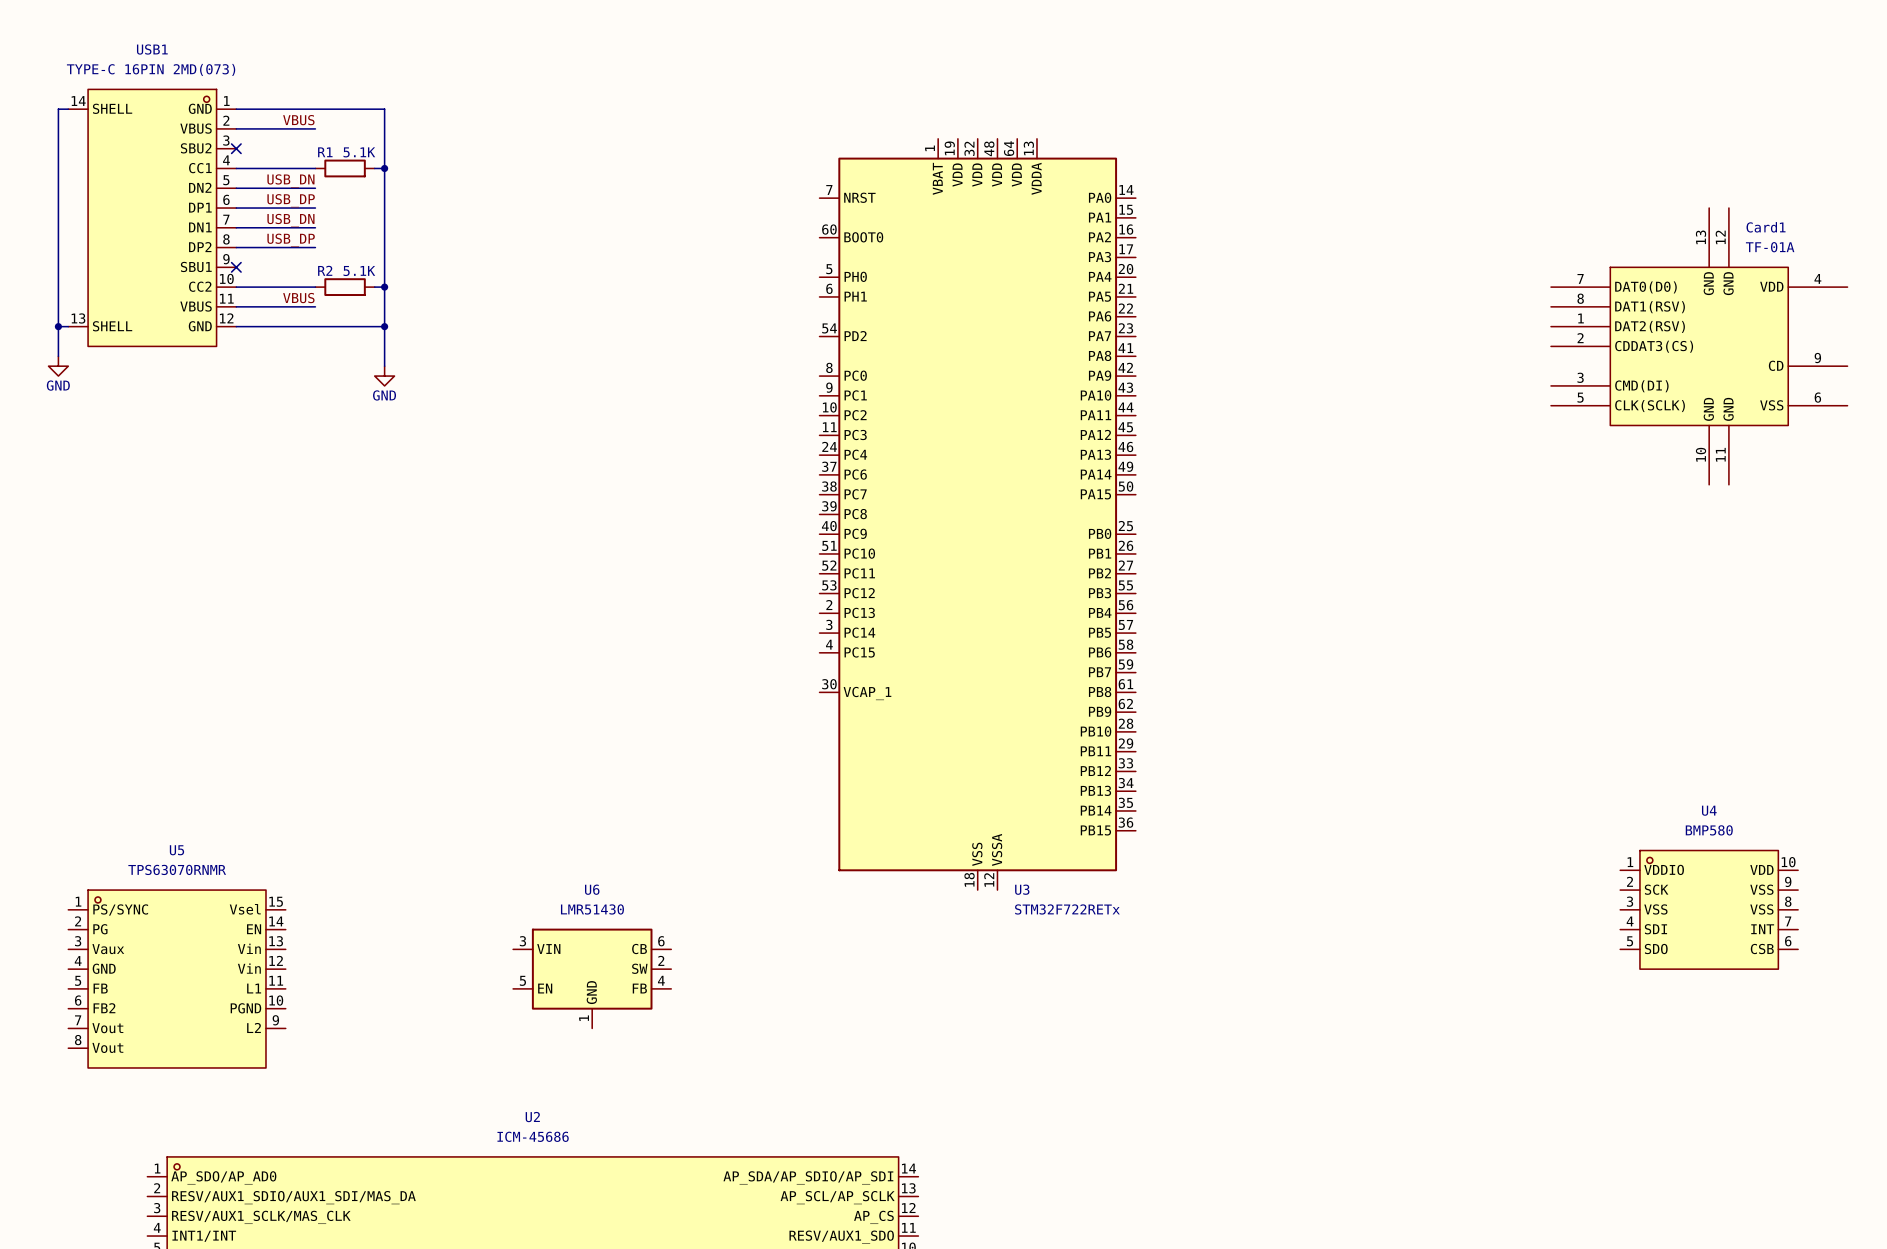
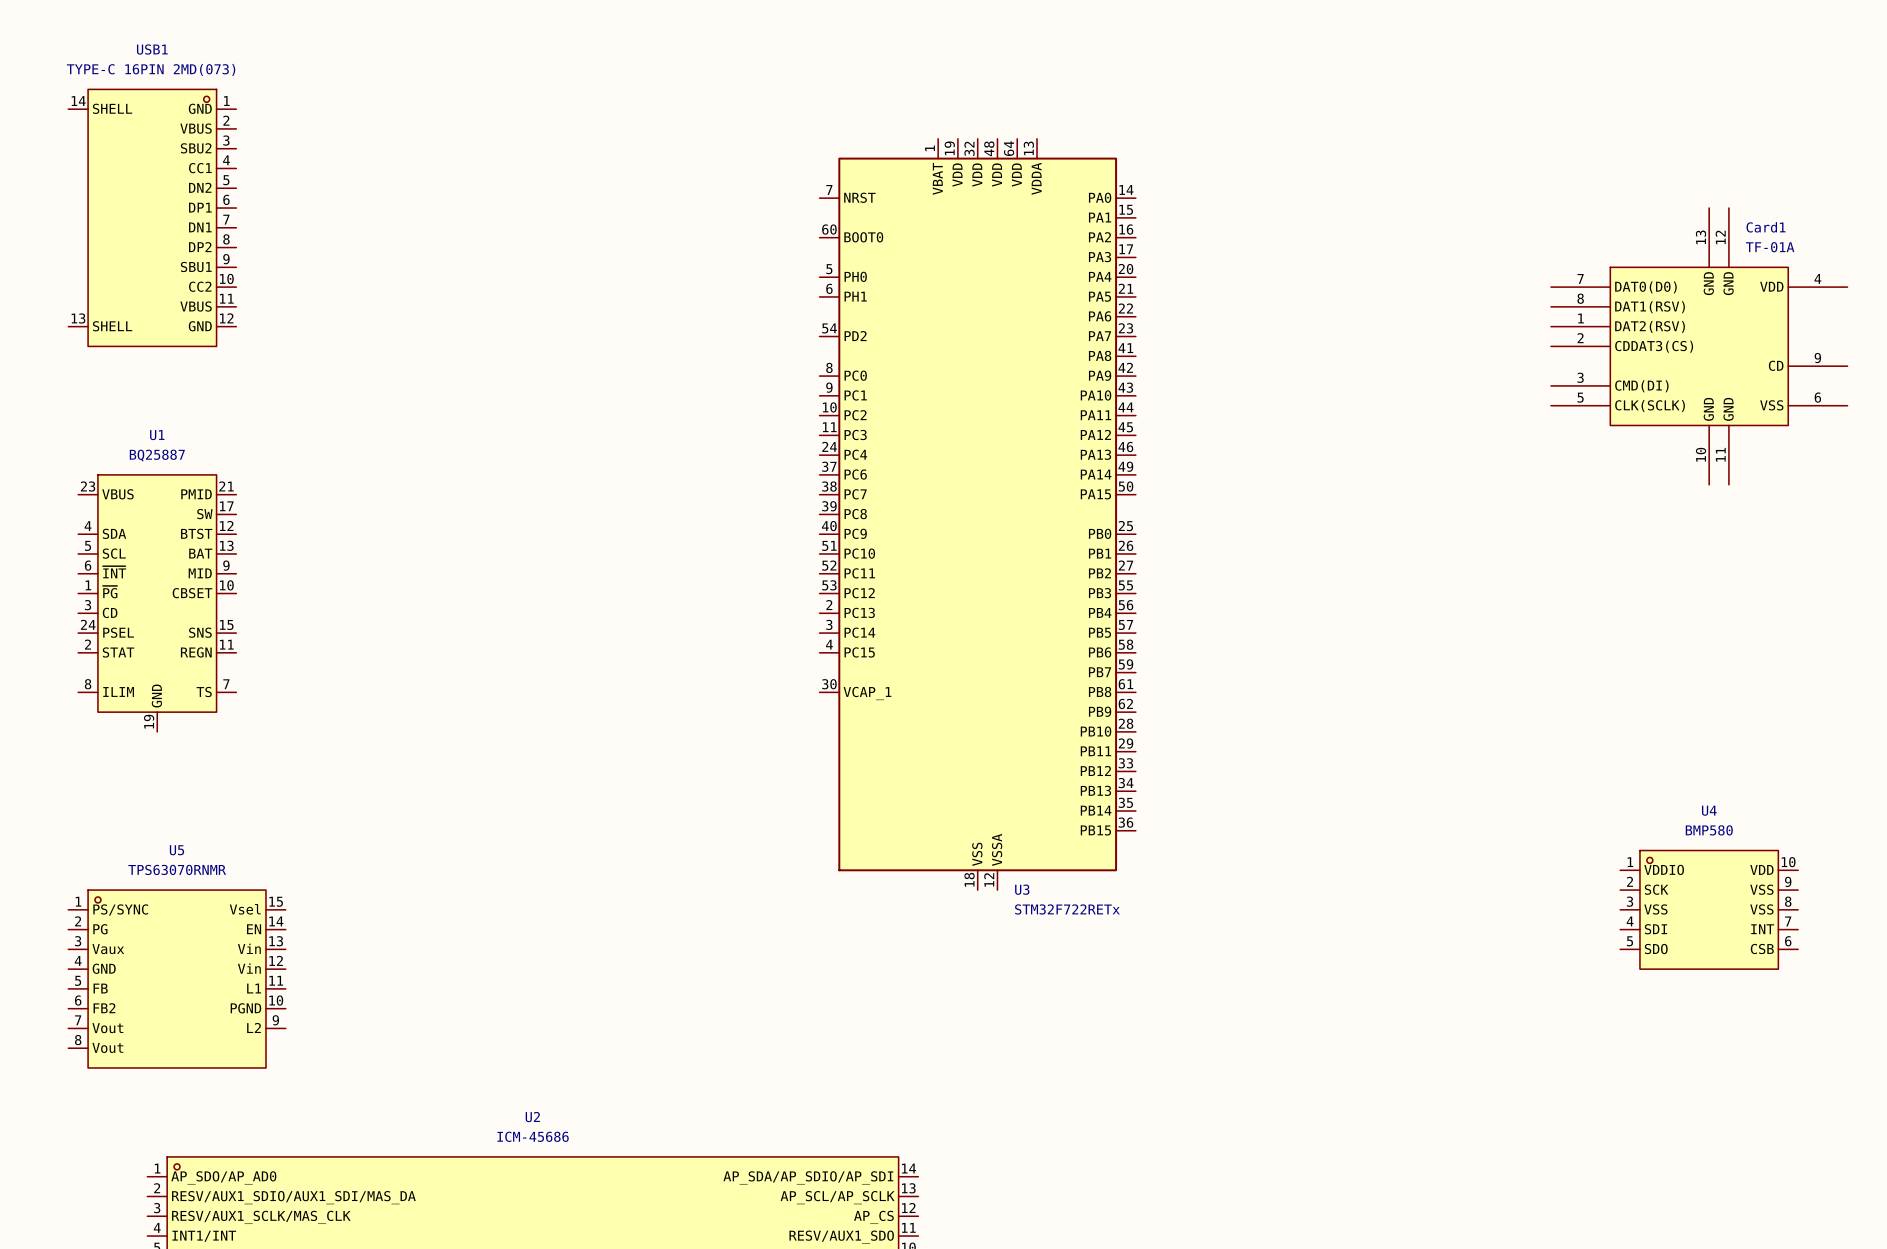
wire: (68, 109) (58, 109) (58, 356) -> none
wire: (236, 109) (384, 109) (384, 366) -> none
label: VBUS (298, 120) -> none
wire: (236, 128) (315, 128) -> none
no-connect mark: (236, 148) -> none
wire: (236, 168) (315, 168) -> none
R1: 5.1K (345, 168) -> none
wire: (374, 168) (384, 168) -> none
junction: (384, 168) -> none
label: USB_DN (290, 180) -> none
wire: (236, 188) (315, 188) -> none
label: USB_DP (291, 200) -> none
wire: (236, 208) (315, 208) -> none
label: USB_DN (290, 220) -> none
wire: (236, 227) (315, 227) -> none
label: USB_DP (291, 240) -> none
wire: (236, 247) (315, 247) -> none
no-connect mark: (236, 267) -> none
wire: (236, 287) (315, 287) -> none
R2: 5.1K (345, 287) -> none
wire: (374, 287) (384, 287) -> none
junction: (384, 287) -> none
label: VBUS (298, 298) -> none
wire: (236, 306) (315, 306) -> none
wire: (58, 326) (68, 326) -> none
junction: (58, 326) -> none
wire: (236, 326) (384, 326) -> none
junction: (384, 326) -> none
power symbol: GND (58, 366) -> none
power symbol: GND (384, 376) -> none
U1: none -> BQ25887 (157, 603)
U6: LMR51430 (592, 978) -> none

